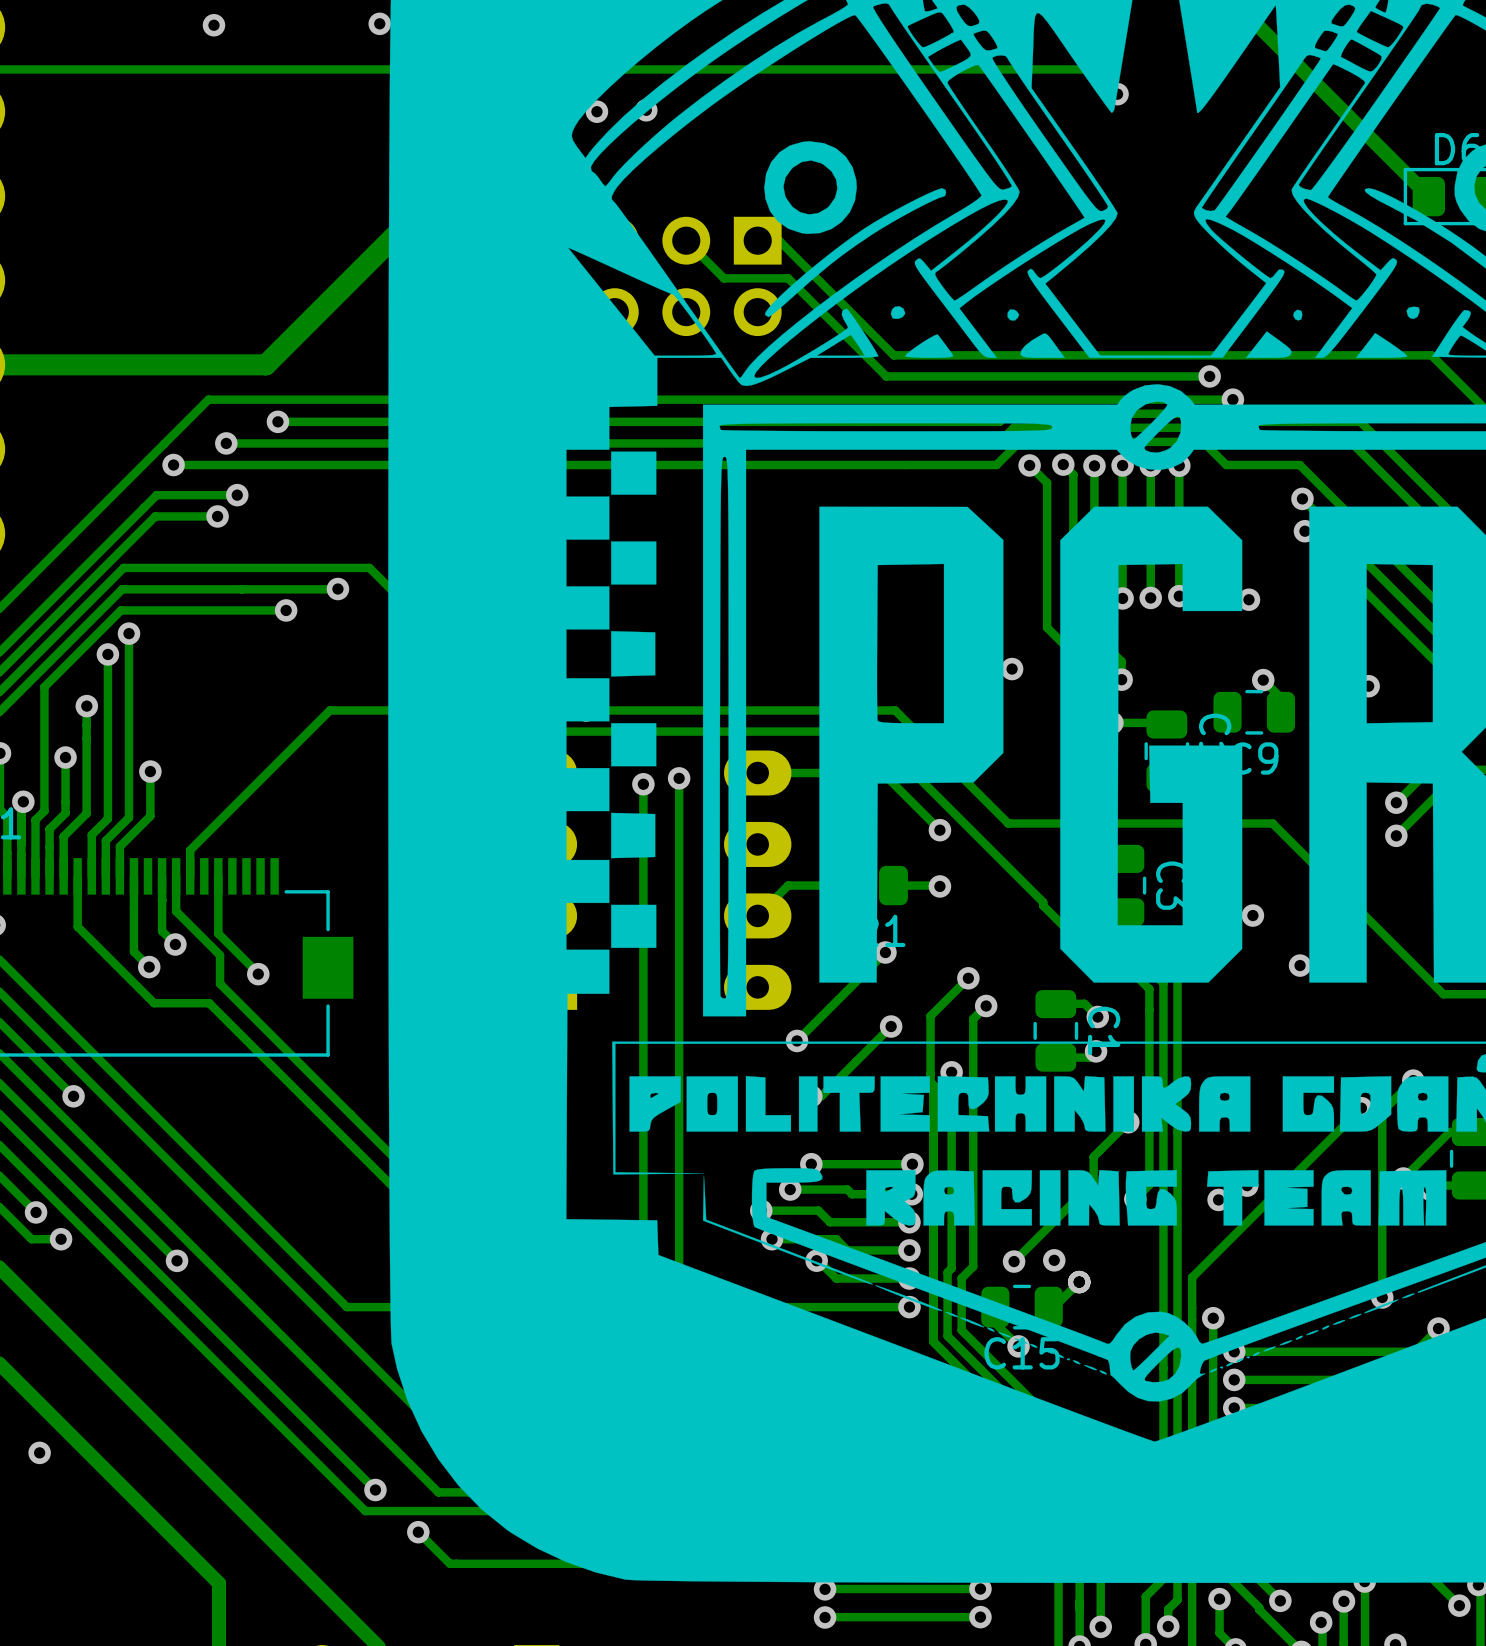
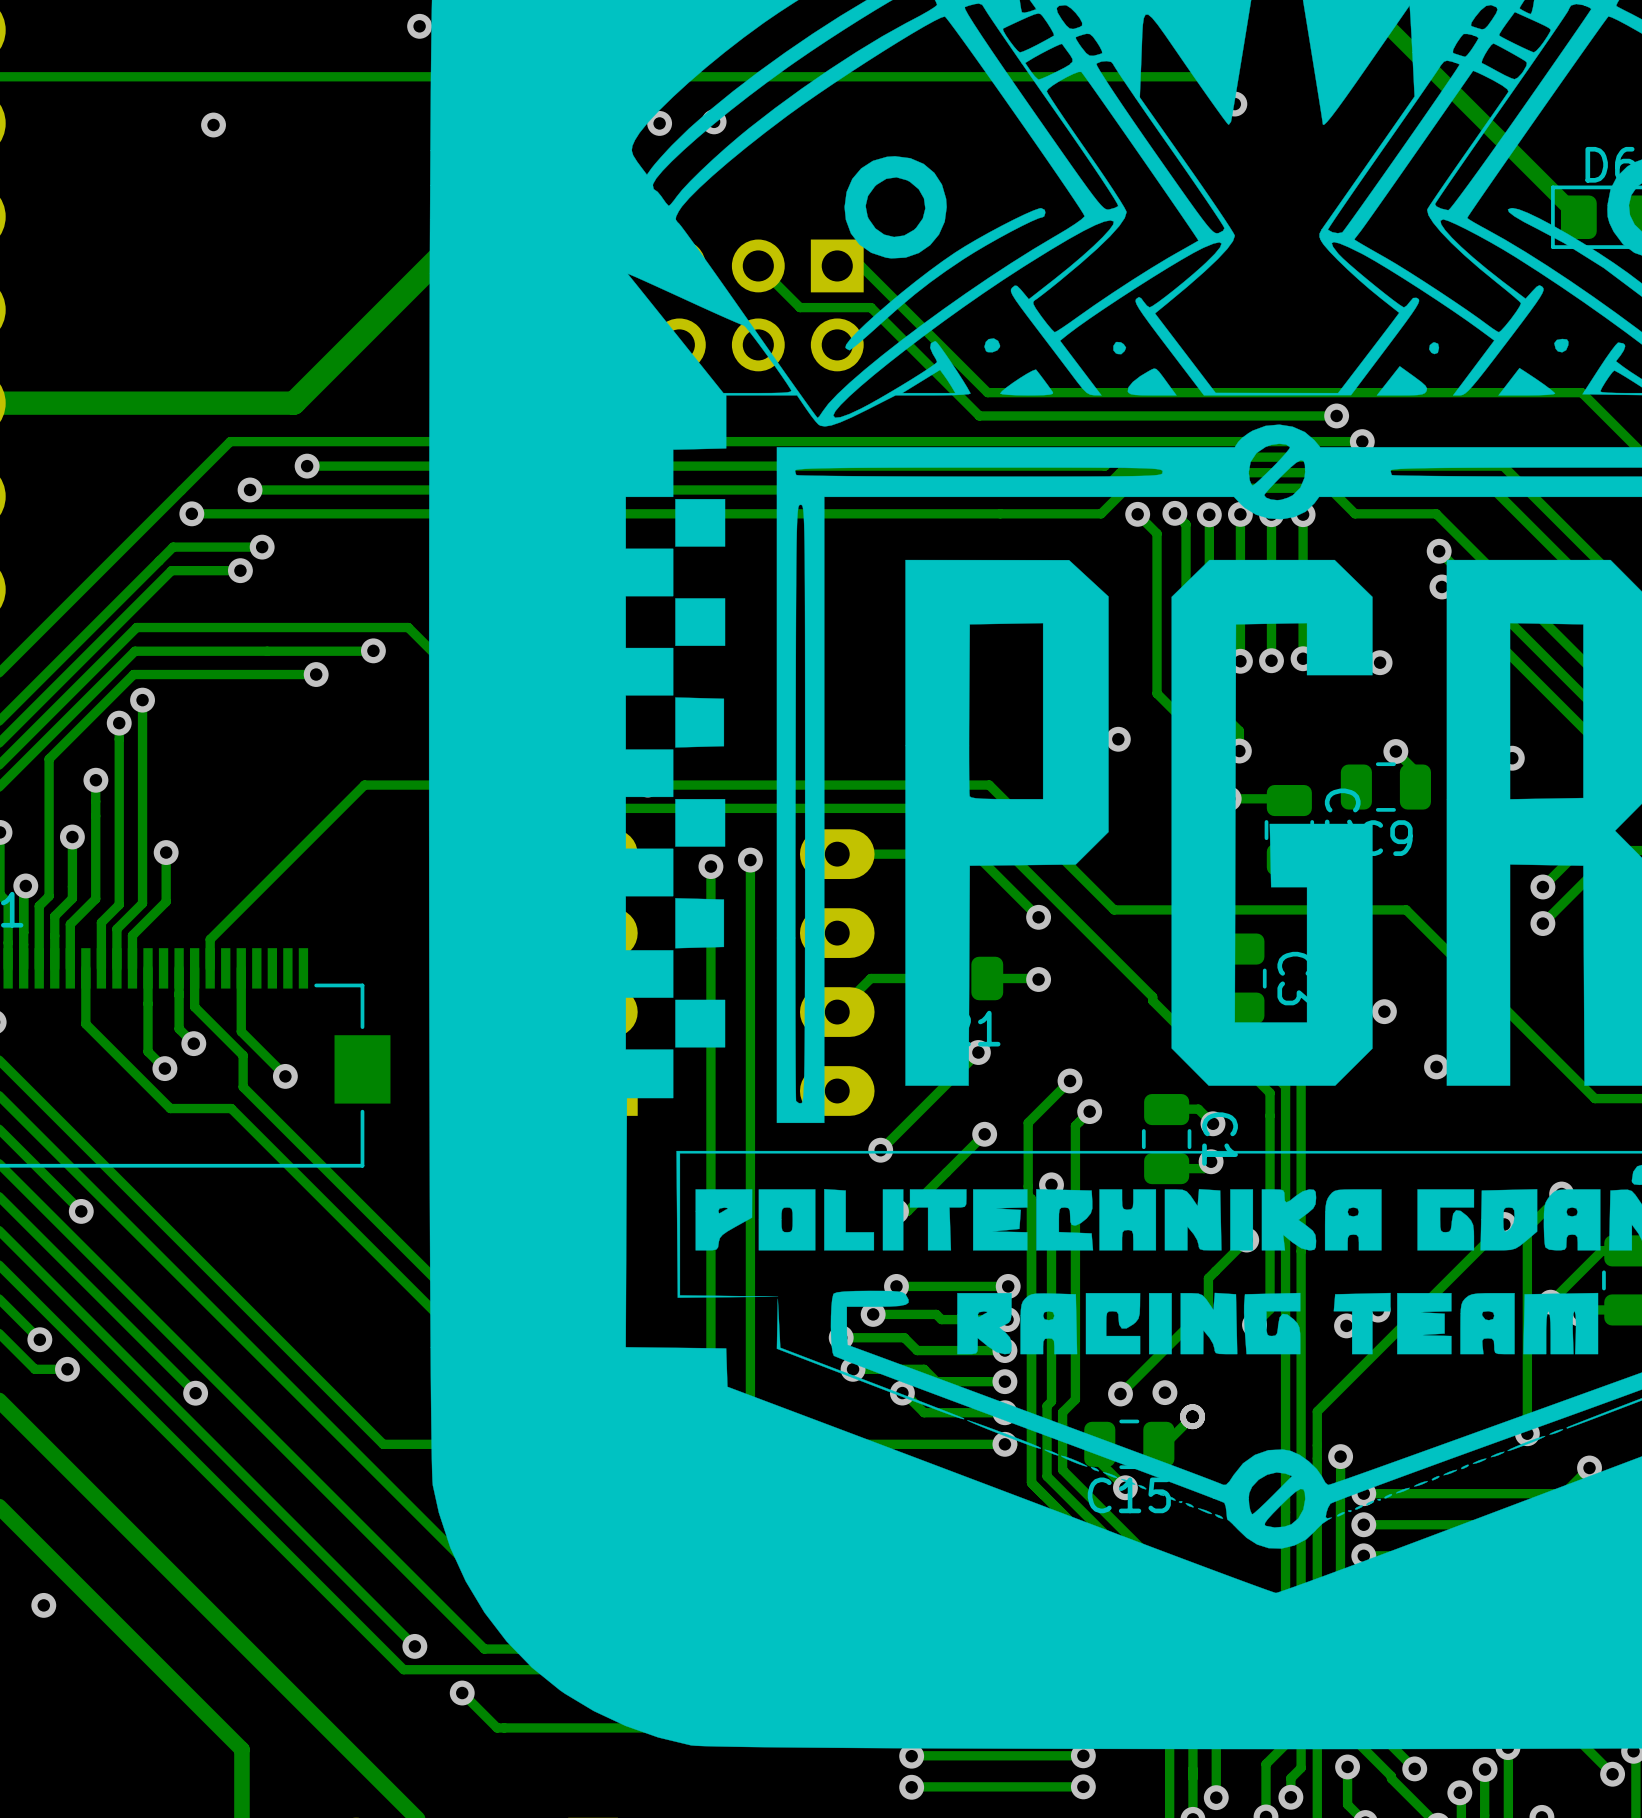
via: (213, 25) -> none
via: none -> (213, 125)

